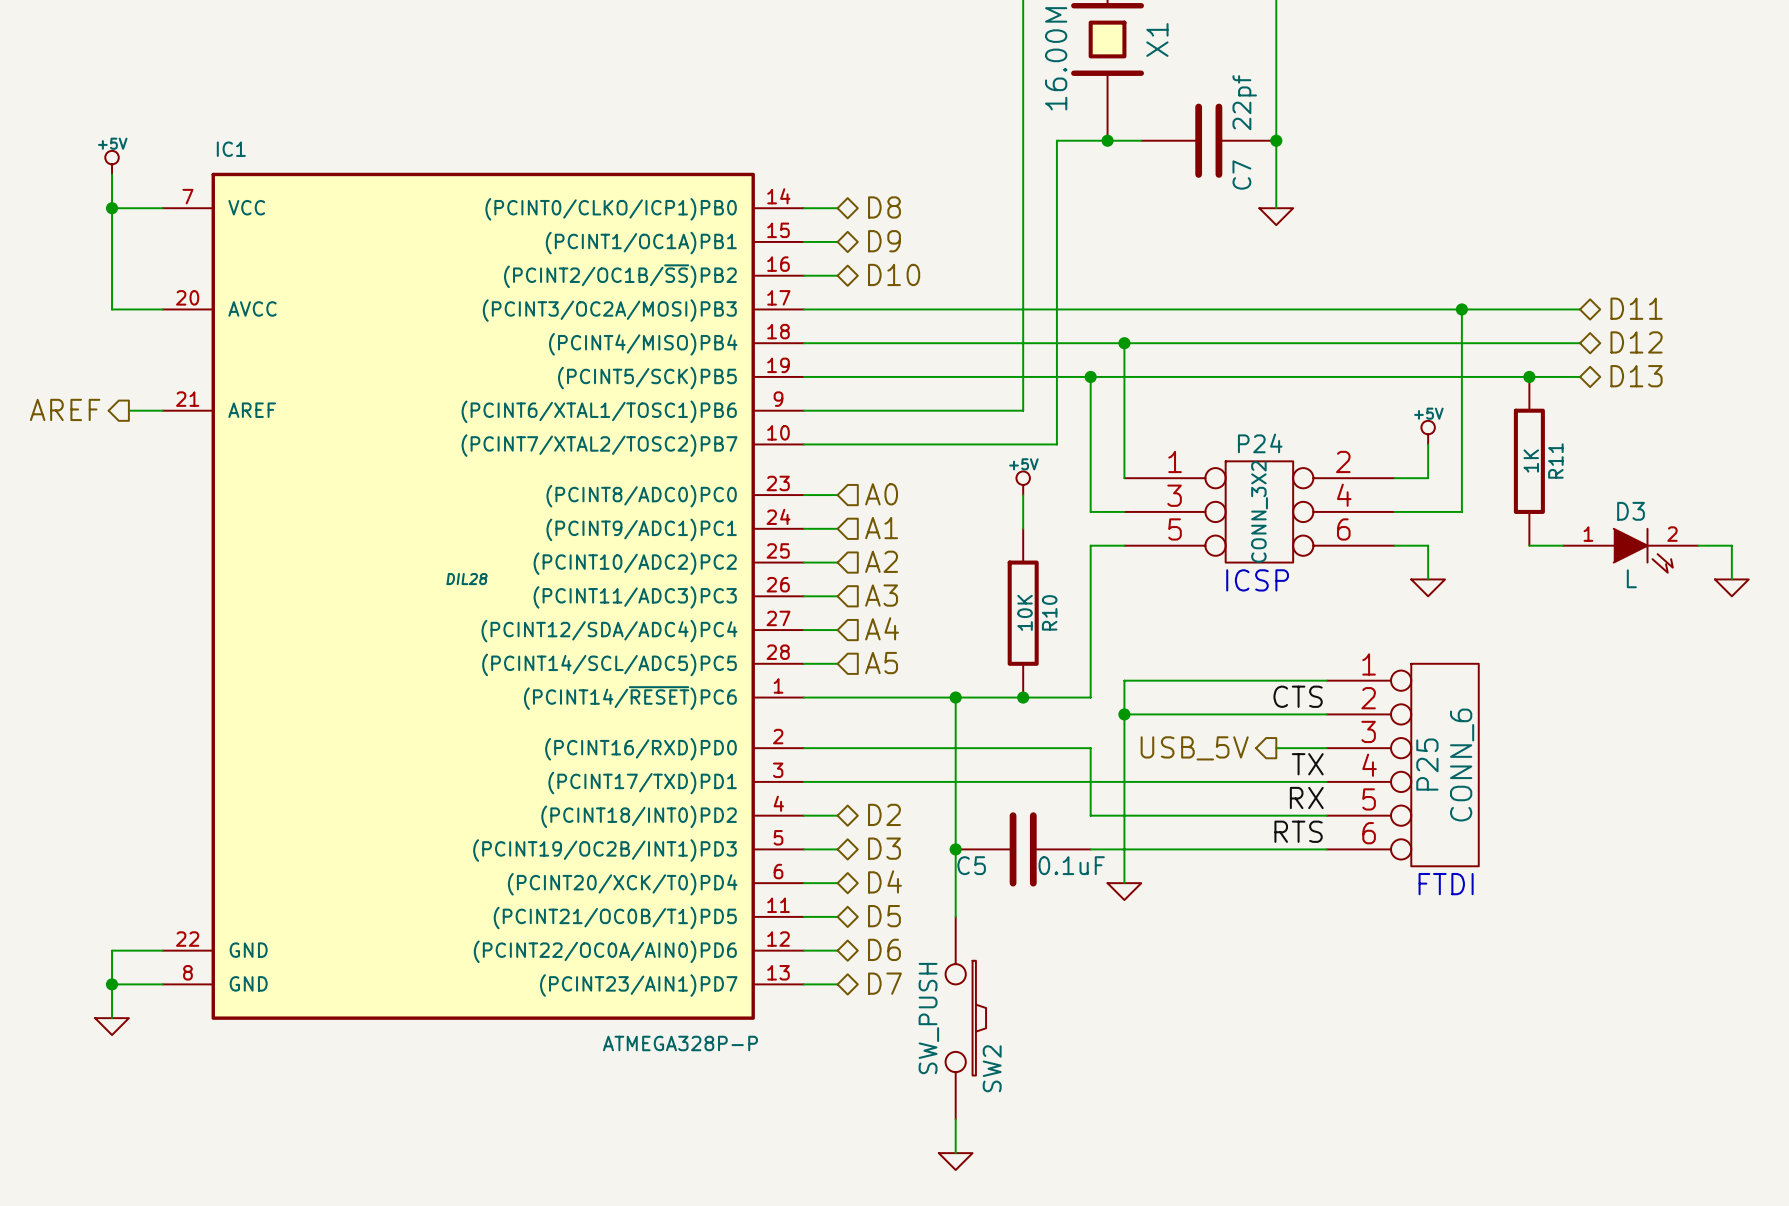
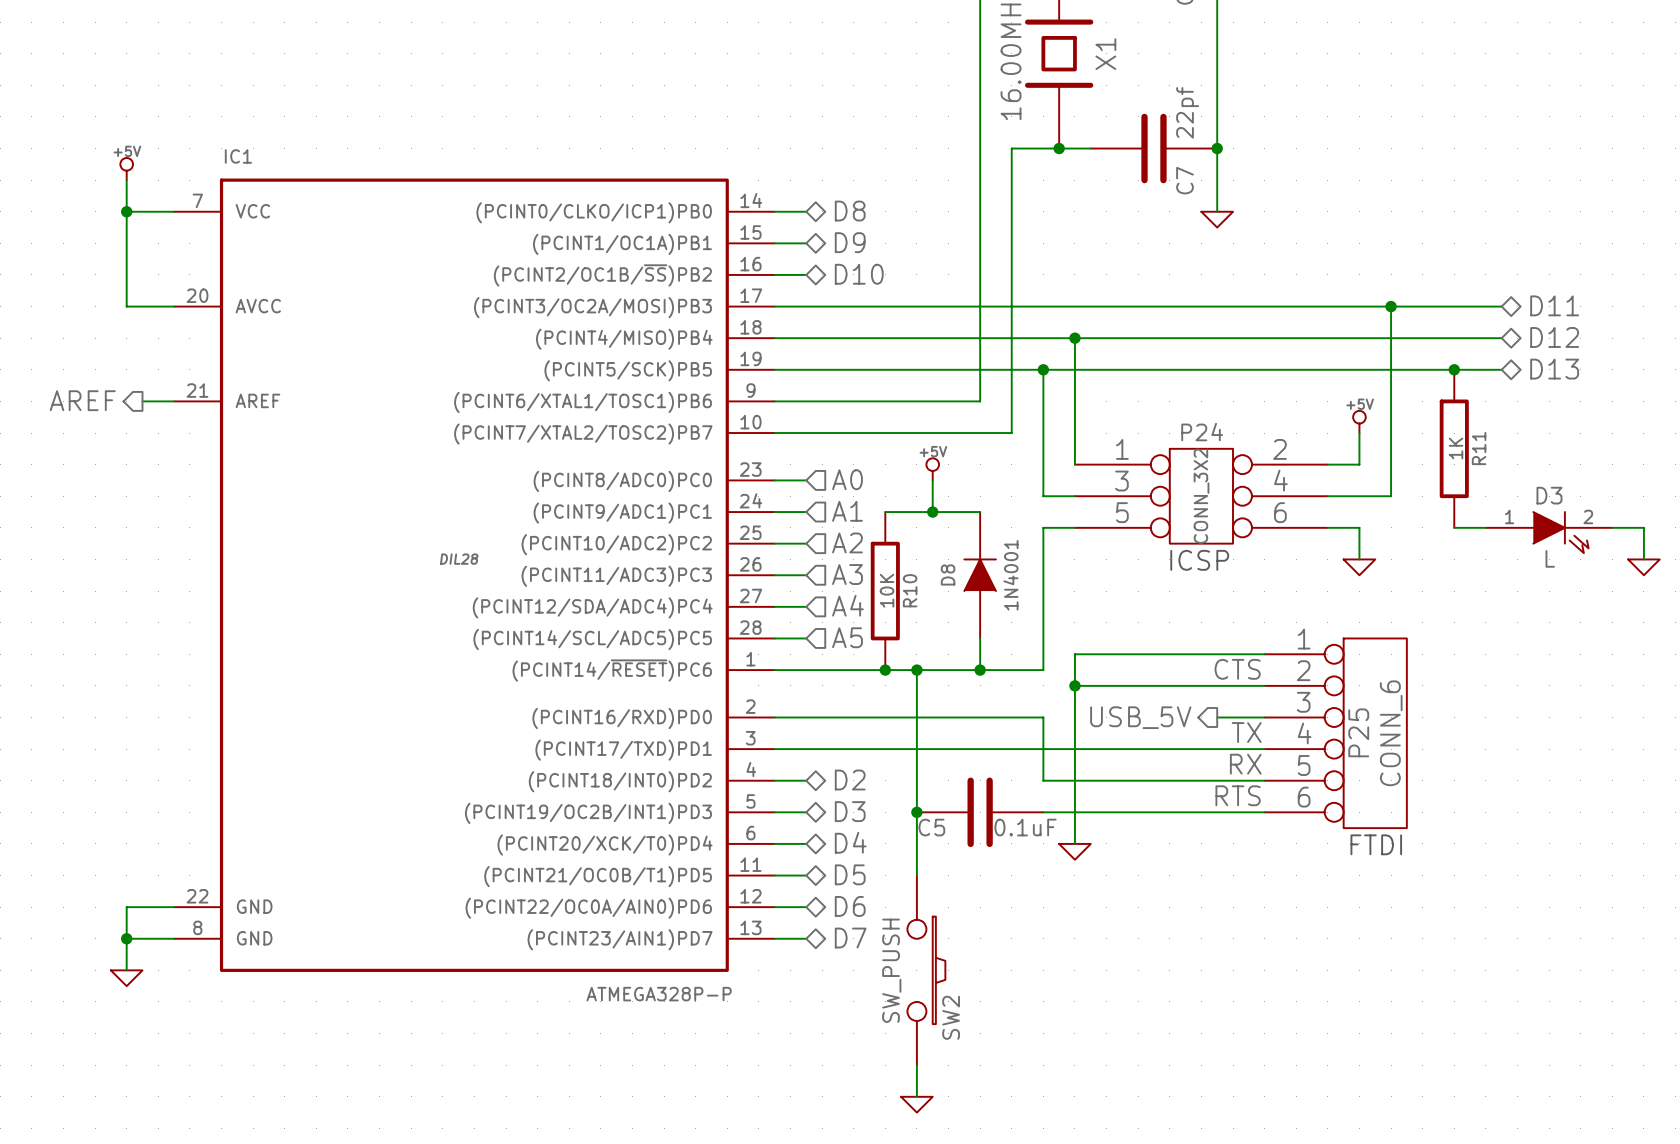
power symbol position: +5V (1023, 483) -> +5V (932, 469)
wire: none -> (932, 480) (932, 512)
wire: (1023, 495) (1023, 528) -> (885, 512) (980, 512)
junction: none -> (932, 512)
D8: none -> 1N4001 (980, 575)
R10 position: (1023, 613) -> (885, 591)
junction: none -> (885, 670)

